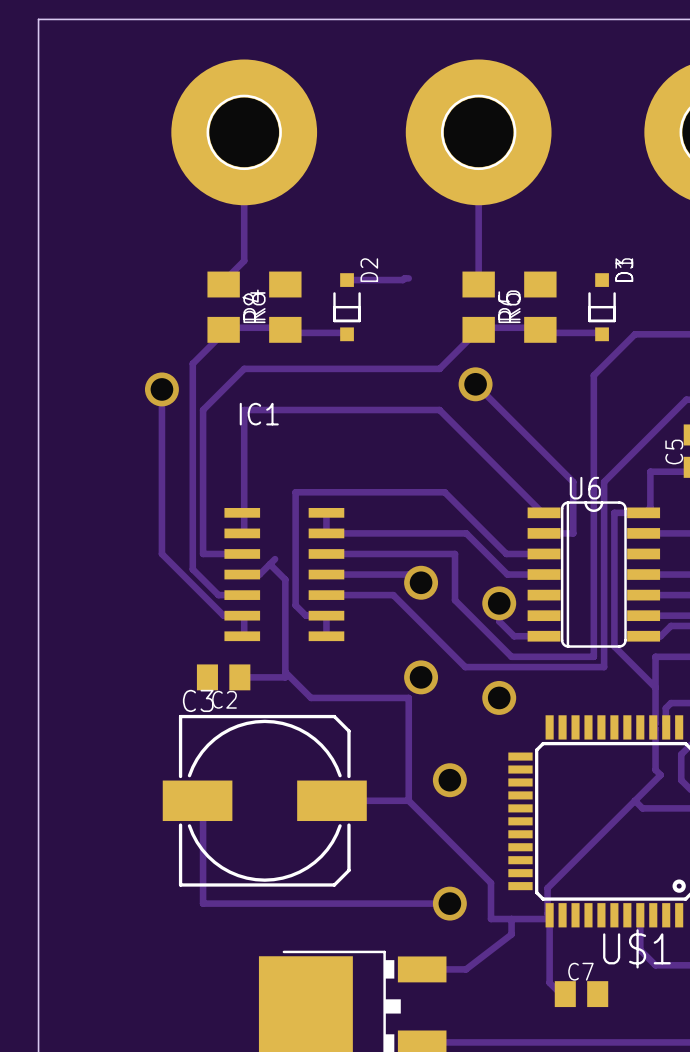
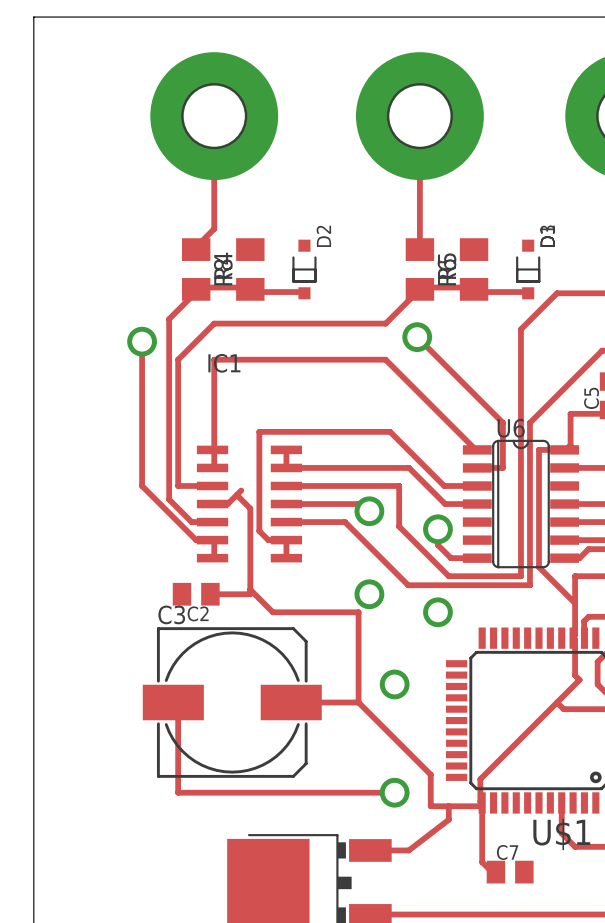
track: (408, 278) (402, 280) (347, 280) -> none

